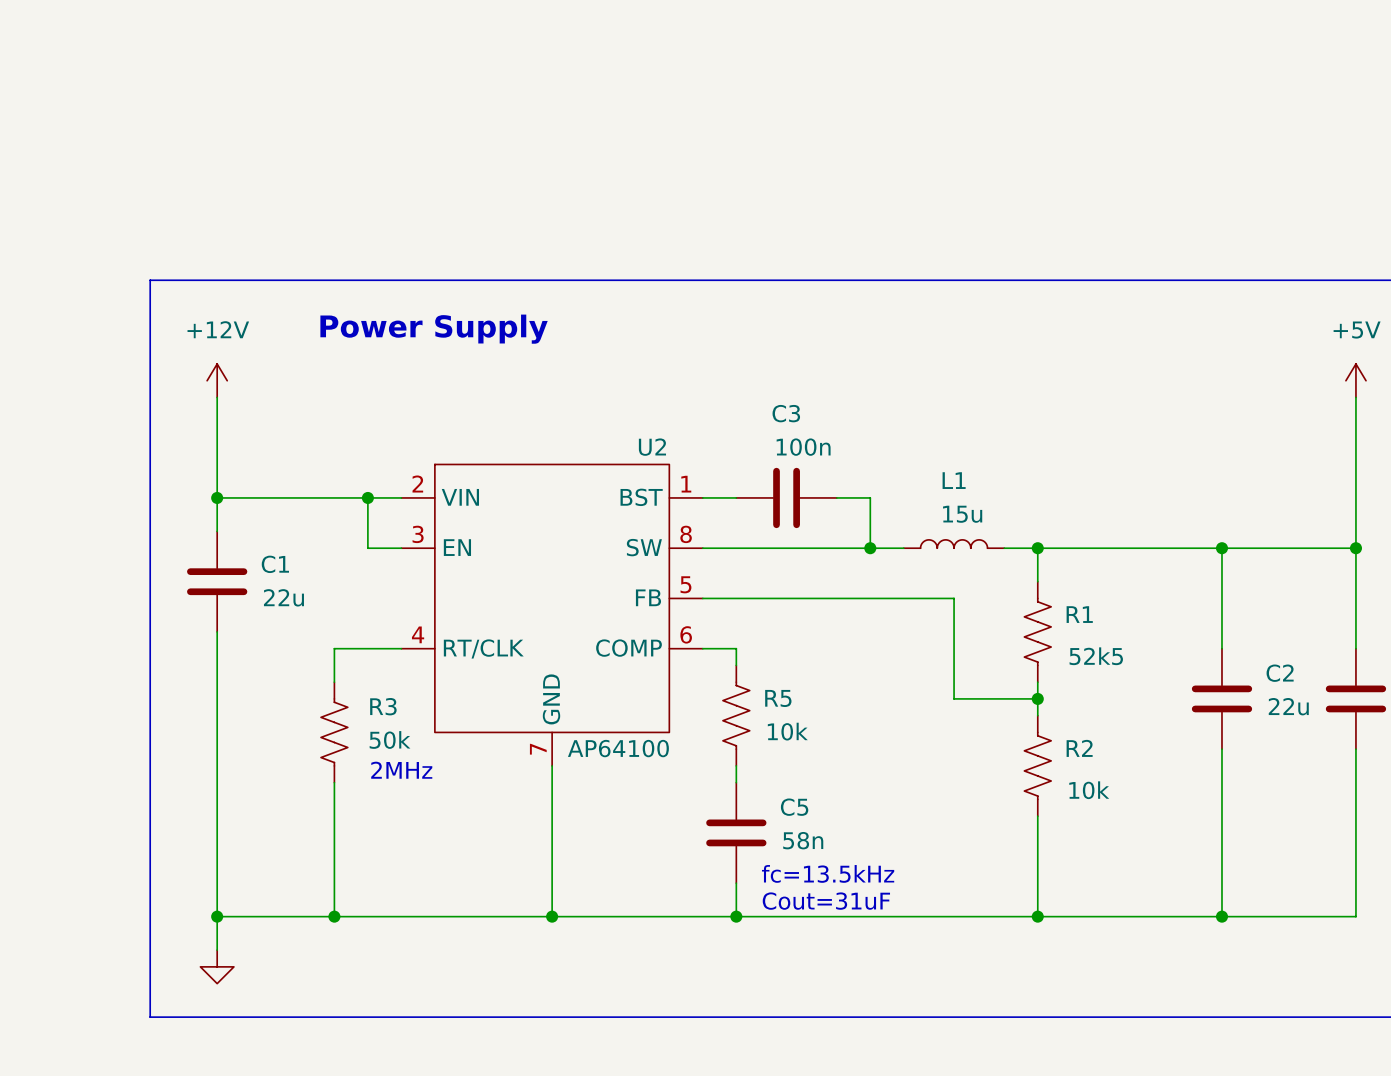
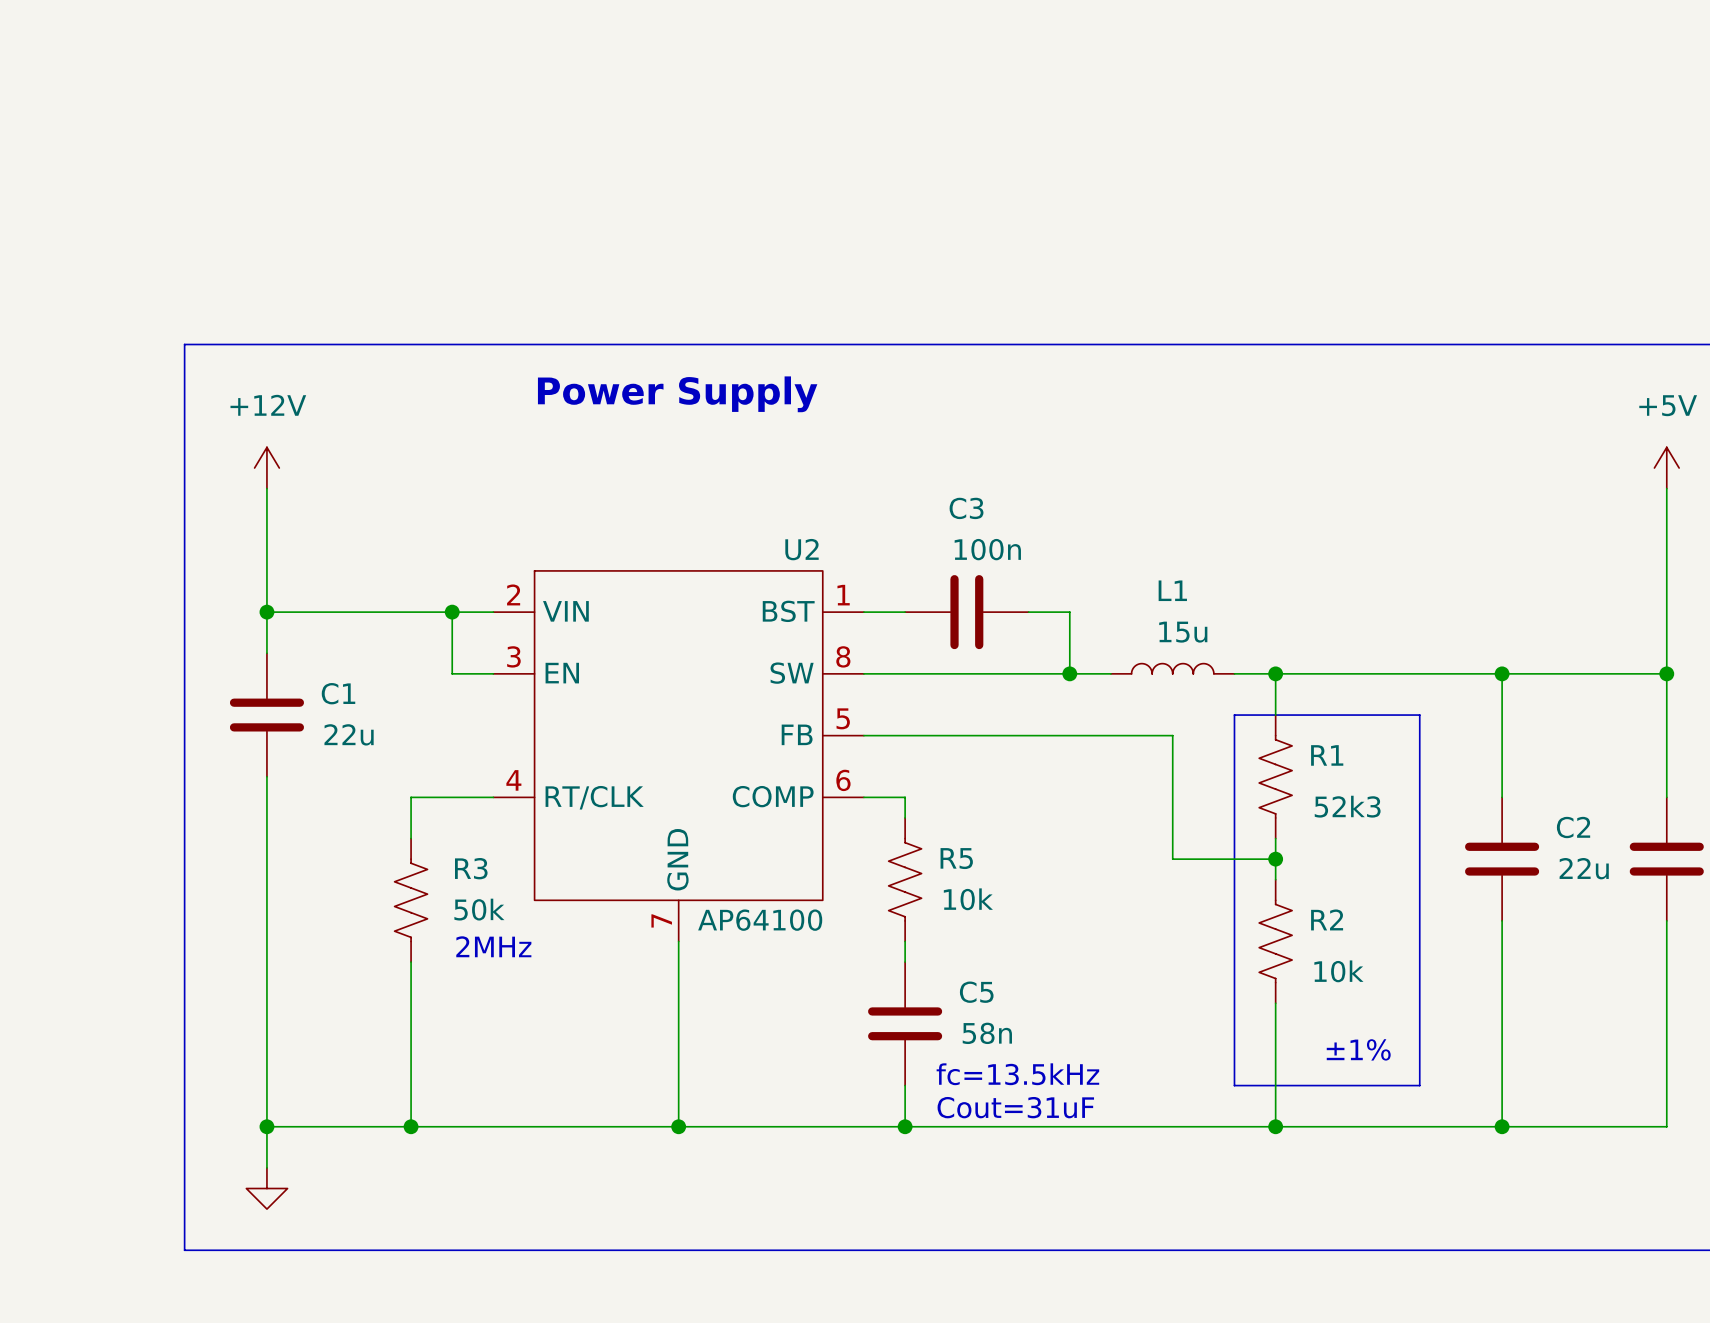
text position: Power Supply (434, 329) -> Power Supply (677, 394)
line: none -> (1234, 715) (1419, 715) (1419, 1085) (1234, 1085) (1234, 715)
R1 value: 52k5 (1096, 656) -> 52k3 (1347, 806)
text: none -> ±1% (1358, 1049)

